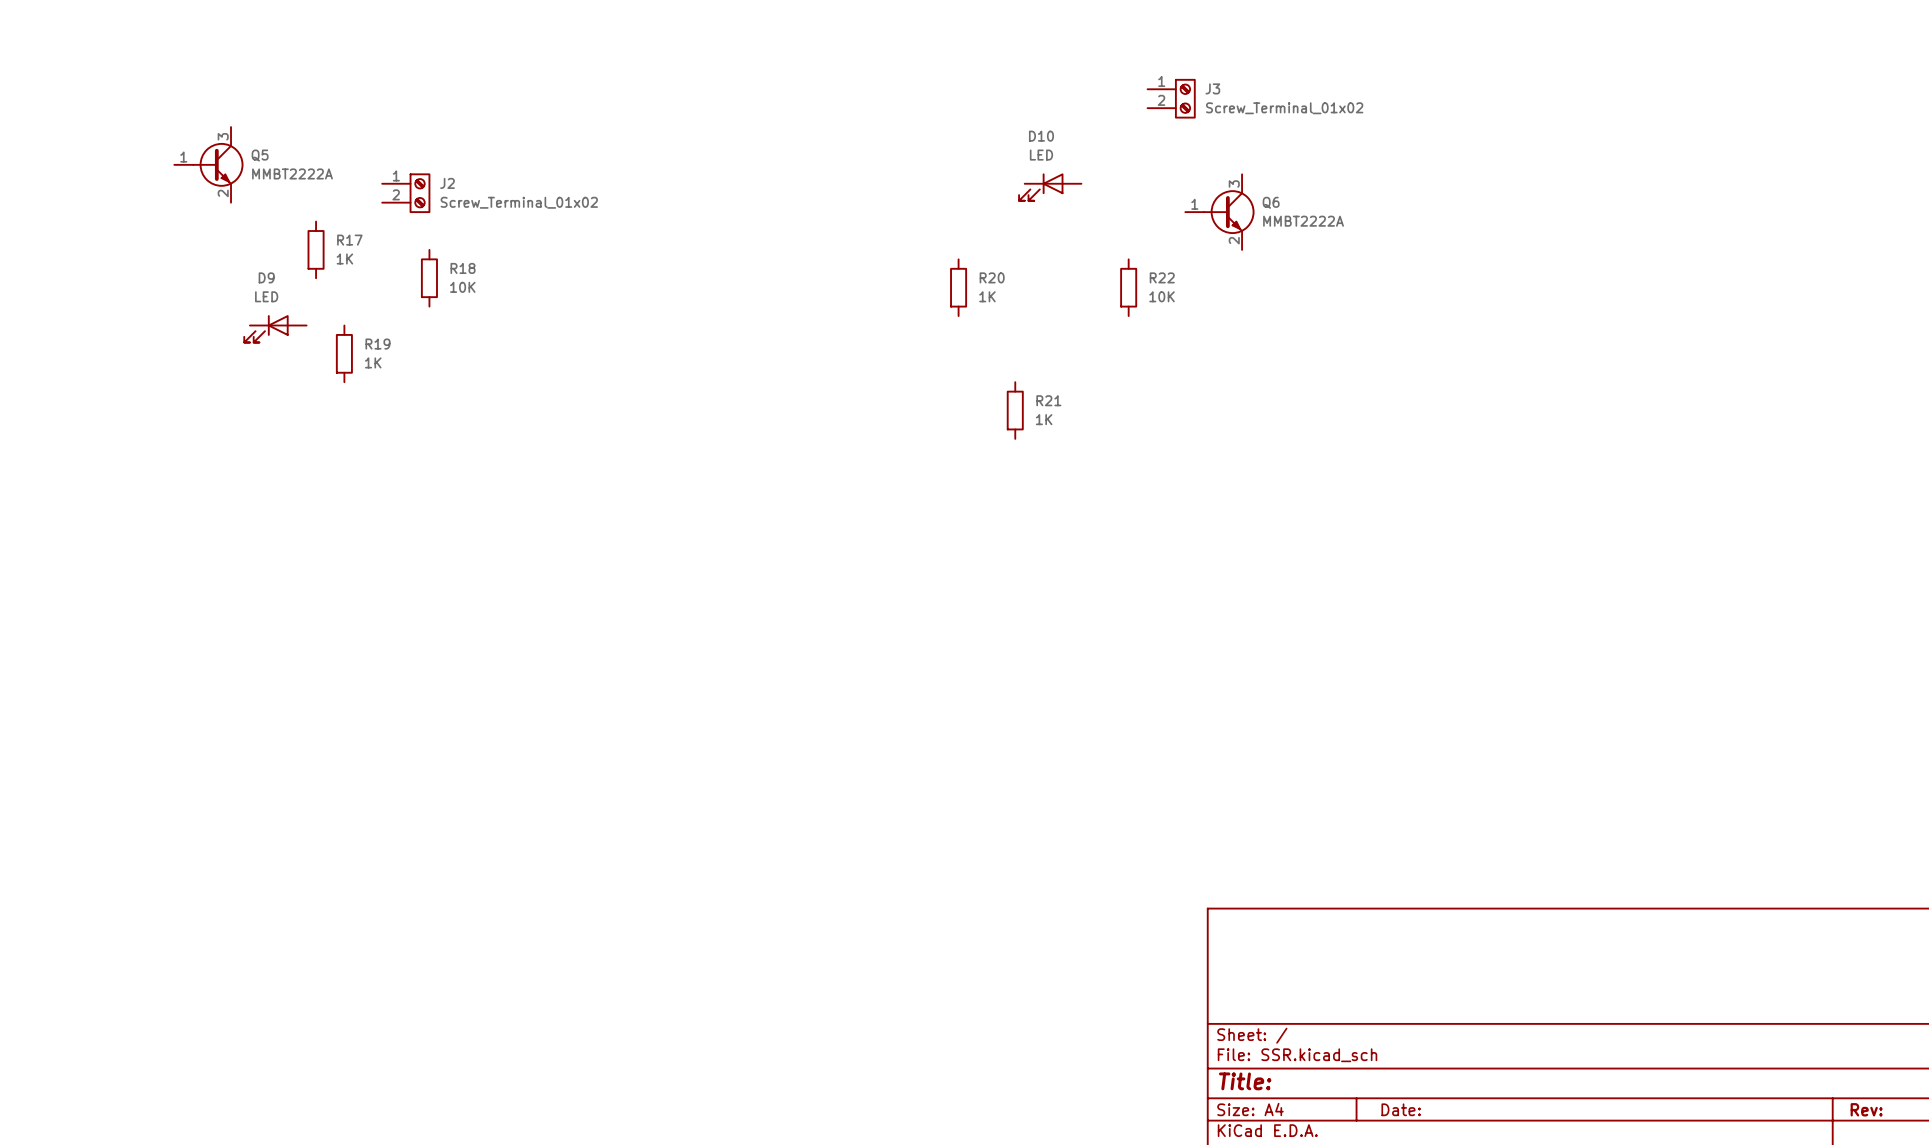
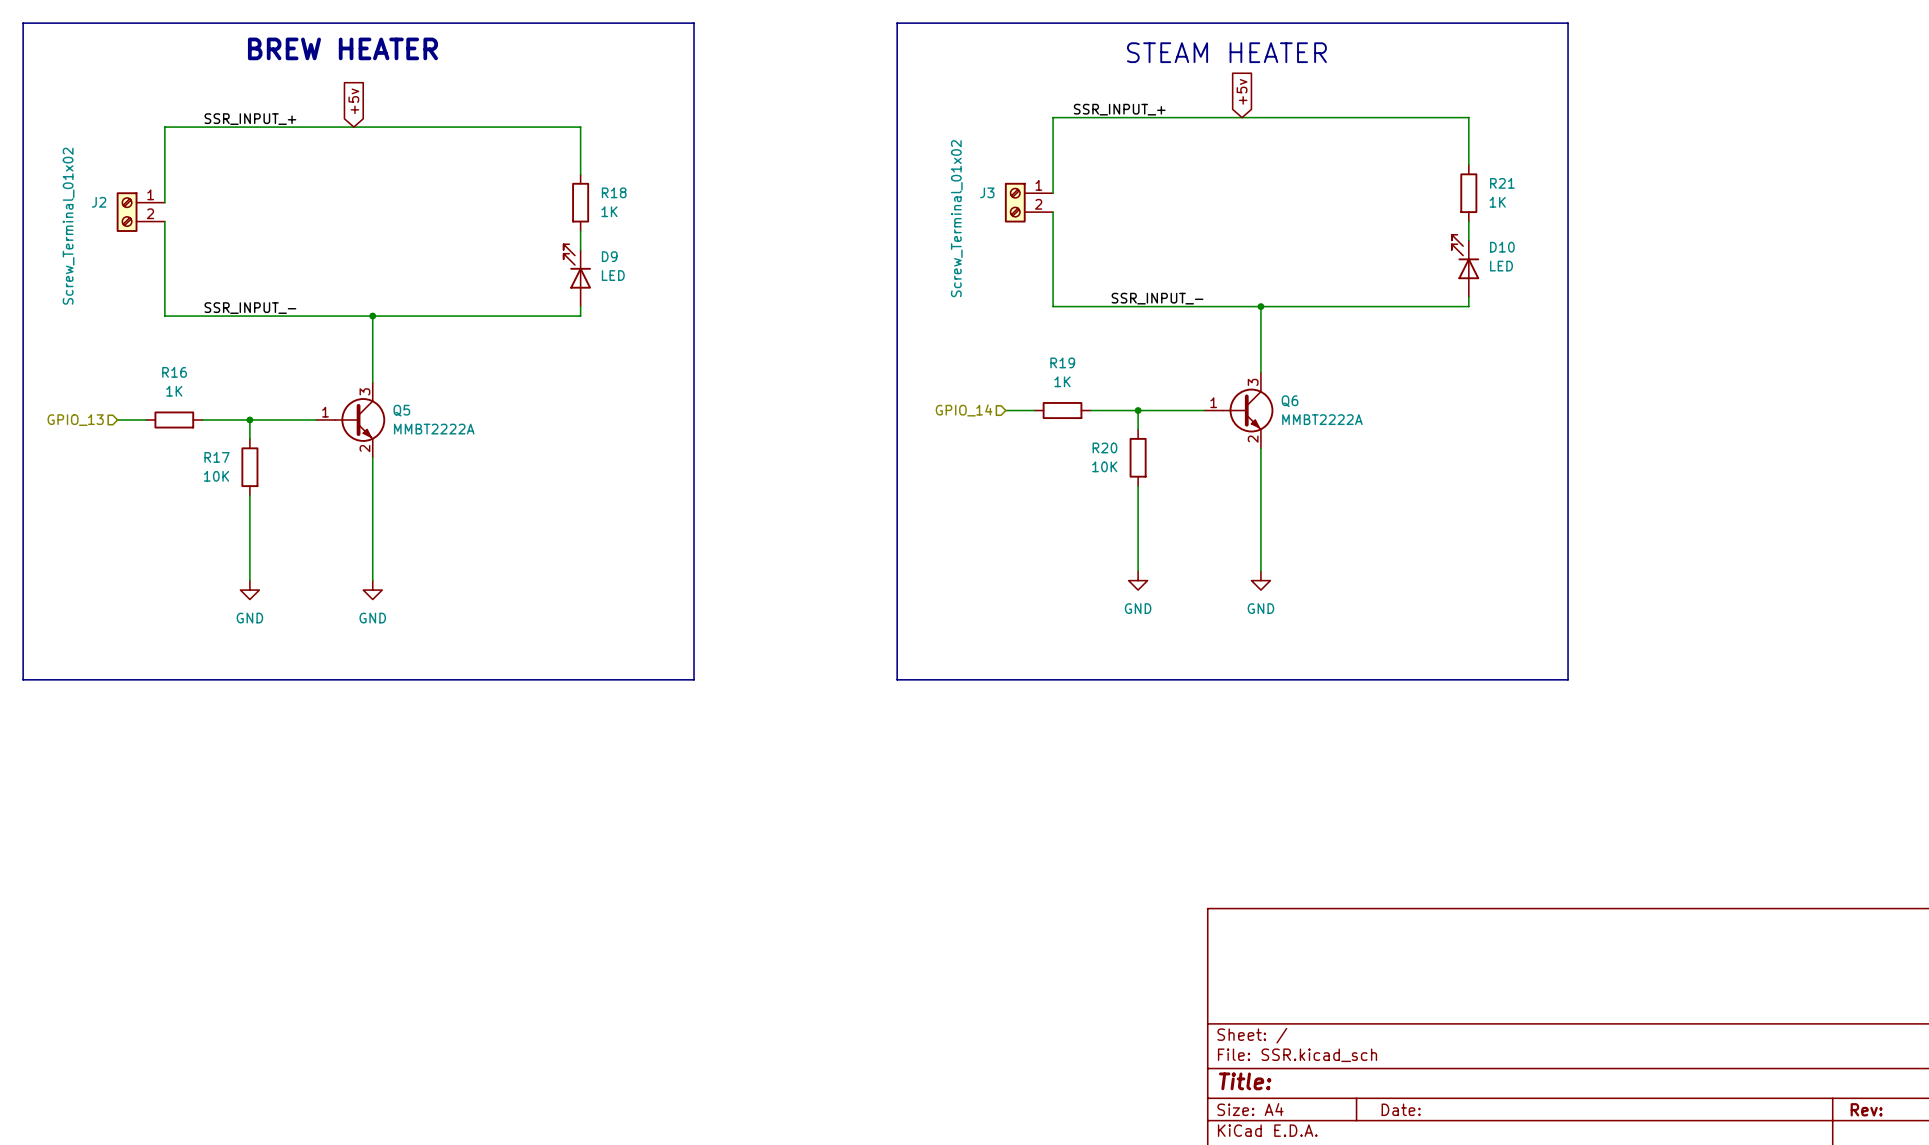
line: none -> (23, 23) (694, 23) (694, 679) (23, 679) (23, 23)
line: none -> (897, 23) (1568, 23) (1568, 679) (897, 679) (897, 23)
text: none -> BREW HEATER (342, 48)
text: none -> STEAM HEATER (1226, 52)
global label: none -> +5v (1242, 91)
J3 position: (1171, 98) -> (1028, 202)
J3 flip: as is (1185, 98) -> left-right (1015, 202)
global label: none -> +5v (353, 101)
J3 value position: Screw_Terminal_01x02 (1284, 108) -> Screw_Terminal_01x02 (956, 218)
label: none -> SSR_INPUT_+ (1119, 109)
label: none -> SSR_INPUT_+ (250, 119)
D10 name position: D10 (1041, 136) -> D10 (1502, 247)
Q5 position: (208, 164) -> (350, 419)
wire: none -> (1468, 164) (1468, 117) (1053, 117) (1053, 193)
wire: none -> (580, 174) (580, 127) (164, 127) (164, 202)
D10 rotation: 0° (1041, 187) -> 90° clockwise (1465, 256)
D10 position: (1050, 187) -> (1465, 265)
J2 position: (406, 193) -> (140, 212)
J2 flip: as is (419, 193) -> left-right (127, 212)
J2 value position: Screw_Terminal_01x02 (519, 202) -> Screw_Terminal_01x02 (68, 226)
wire: none -> (1053, 212) (1053, 306) (1468, 306) (1468, 297)
Q6 position: (1219, 212) -> (1238, 410)
wire: none -> (164, 221) (164, 316) (580, 316) (580, 306)
wire: none -> (1468, 221) (1468, 240)
wire: none -> (580, 231) (580, 249)
R17 name position: R17 (349, 240) -> R17 (216, 457)
R17 position: (316, 249) -> (249, 467)
R17 value: 1K (344, 259) -> 10K (216, 476)
D9 name position: D9 (266, 277) -> D9 (609, 256)
R20 name position: R20 (992, 277) -> R20 (1104, 447)
R18 position: (429, 278) -> (580, 202)
R18 value: 10K (462, 287) -> 1K (609, 211)
R20 position: (958, 287) -> (1138, 457)
R22: 10K (1128, 287) -> none
R20 value: 1K (987, 296) -> 10K (1104, 466)
label: none -> SSR_INPUT_- (1157, 298)
wire: none -> (1260, 306) (1260, 372)
junction: none -> (1260, 306)
label: none -> SSR_INPUT_- (250, 308)
wire: none -> (372, 316) (372, 382)
junction: none -> (372, 316)
D9 rotation: 0° (266, 328) -> 90° clockwise (577, 266)
D9 position: (275, 328) -> (577, 275)
R19 name position: R19 (377, 344) -> R19 (1062, 362)
R19 rotation: 0° (344, 353) -> 90° clockwise (1062, 410)
R19 position: (344, 353) -> (1062, 410)
R19 value position: 1K (373, 362) -> 1K (1062, 381)
hierarchical label: none -> GPIO_14 (964, 410)
wire: none -> (1005, 410) (1034, 410)
R21 position: (1015, 410) -> (1468, 193)
wire: none -> (1090, 410) (1204, 410)
wire: none -> (1138, 410) (1138, 429)
junction: none -> (1138, 410)
wire: none -> (117, 419) (145, 419)
R16: none -> 1K (174, 419)
wire: none -> (202, 419) (316, 419)
wire: none -> (249, 419) (249, 438)
junction: none -> (249, 419)
hierarchical label: none -> GPIO_13 (75, 420)
wire: none -> (1260, 448) (1260, 571)
wire: none -> (372, 457) (372, 580)
wire: none -> (1138, 486) (1138, 571)
wire: none -> (249, 495) (249, 580)
power symbol: none -> GND (1138, 580)
power symbol: none -> GND (1260, 580)
power symbol: none -> GND (249, 590)
power symbol: none -> GND (372, 590)

